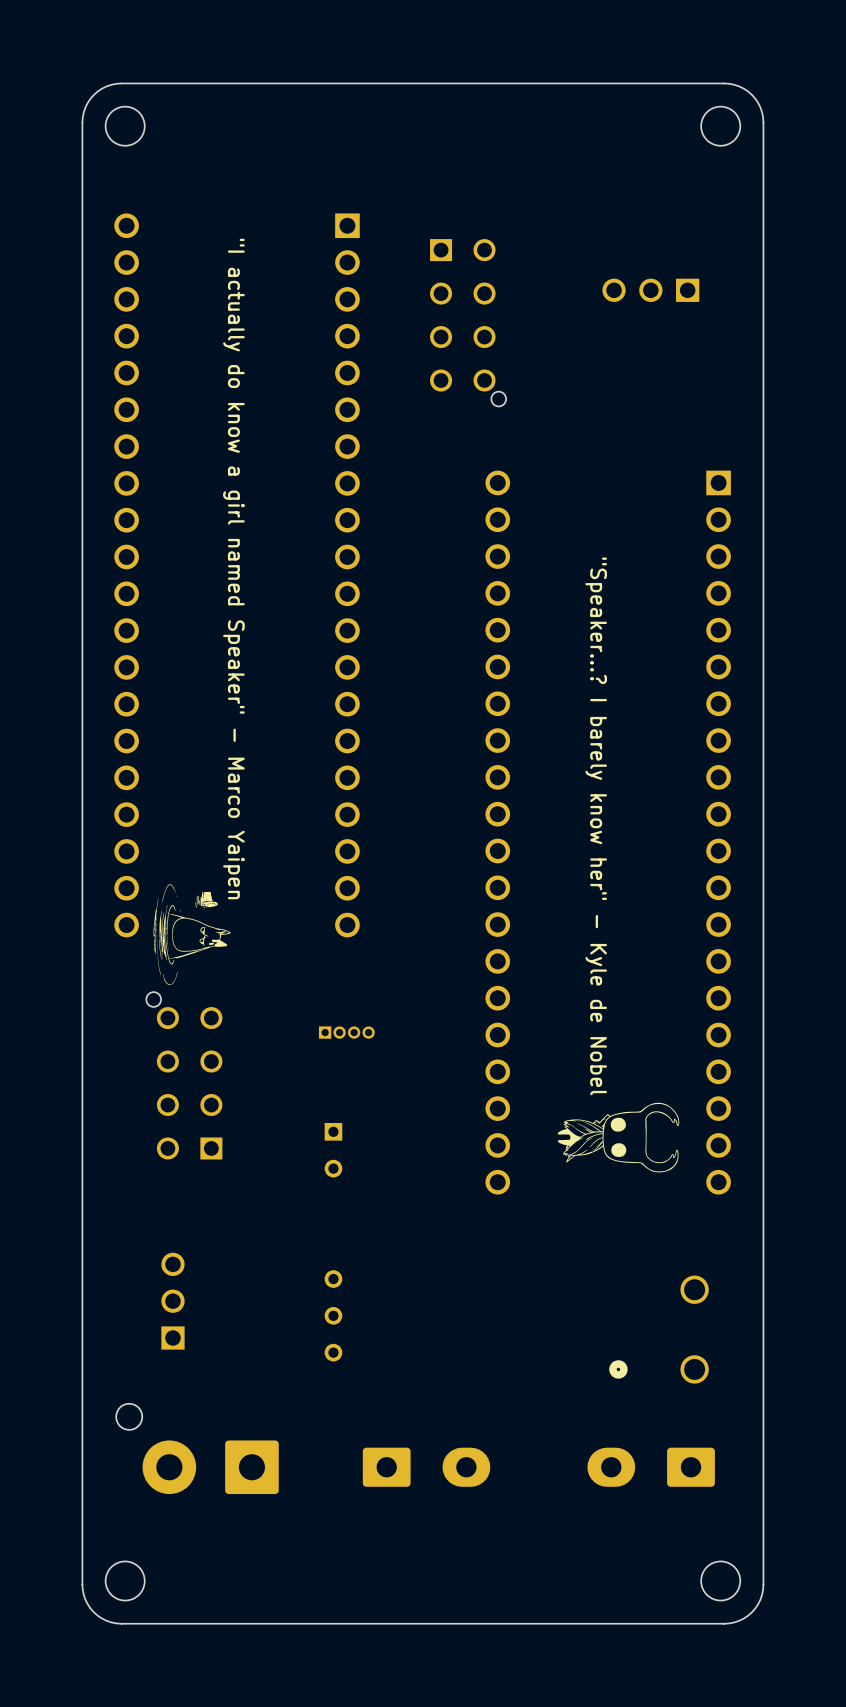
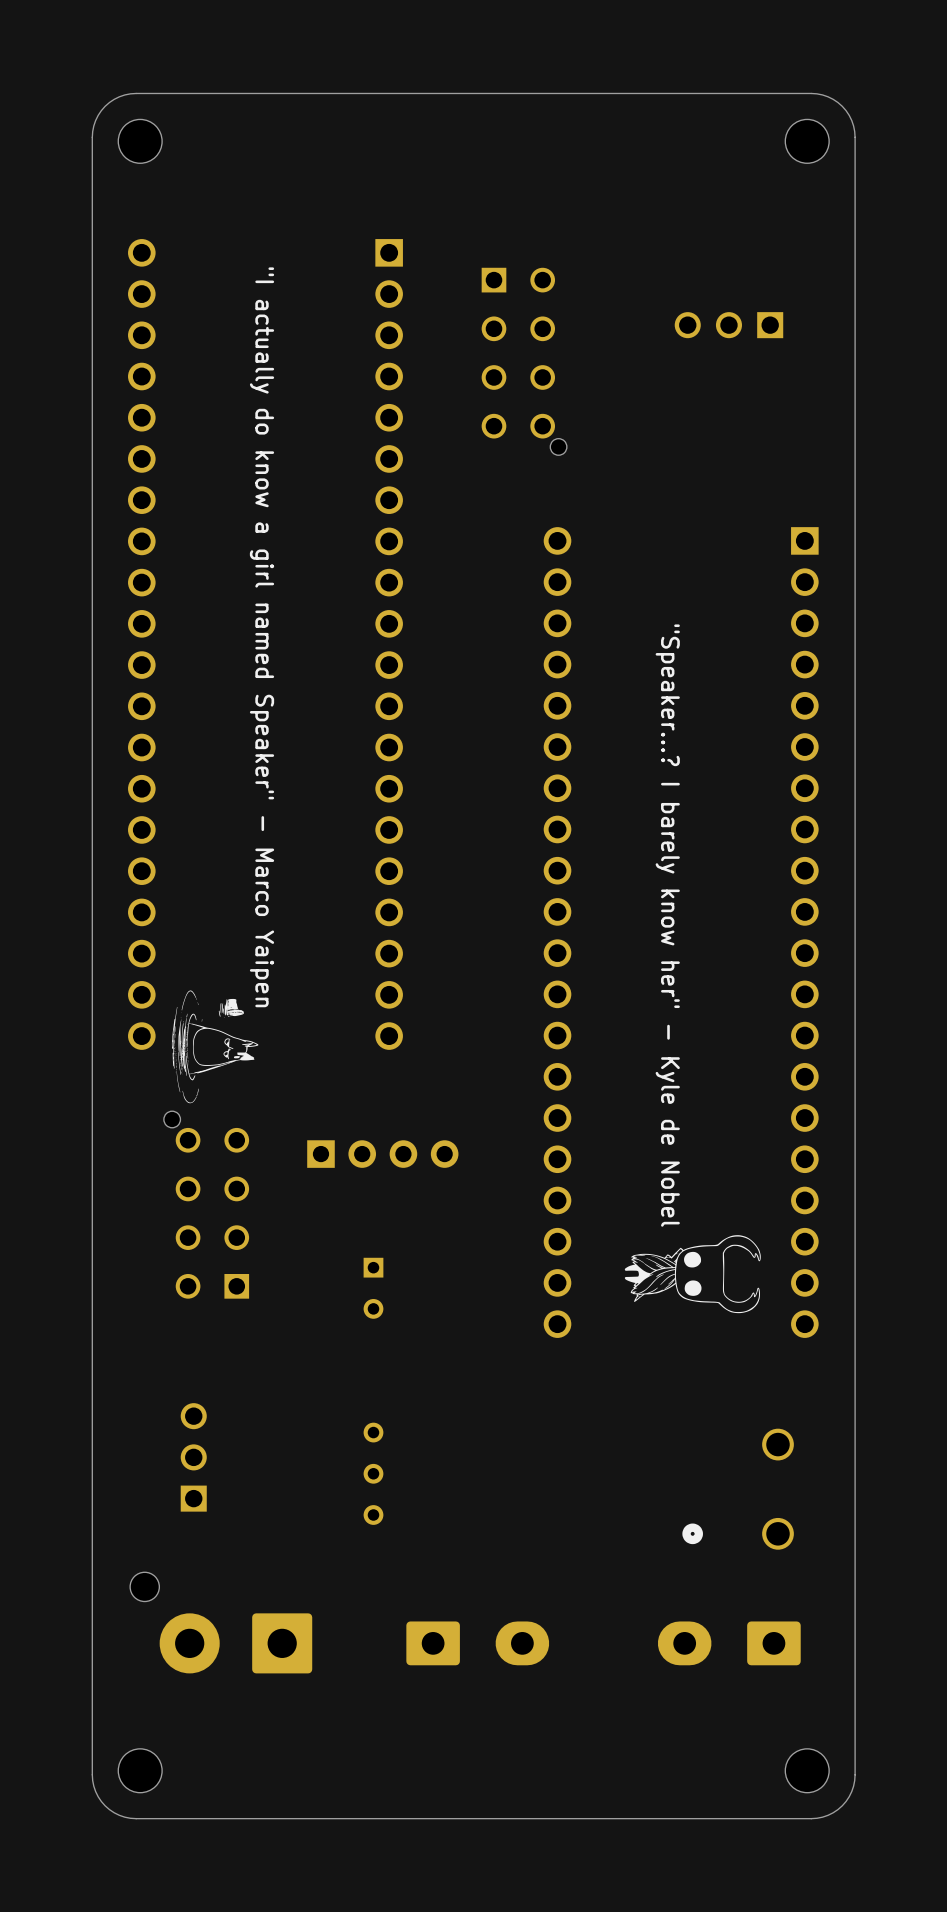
part footprint: [318, 1026, 375, 1039] -> [307, 1140, 459, 1168]

